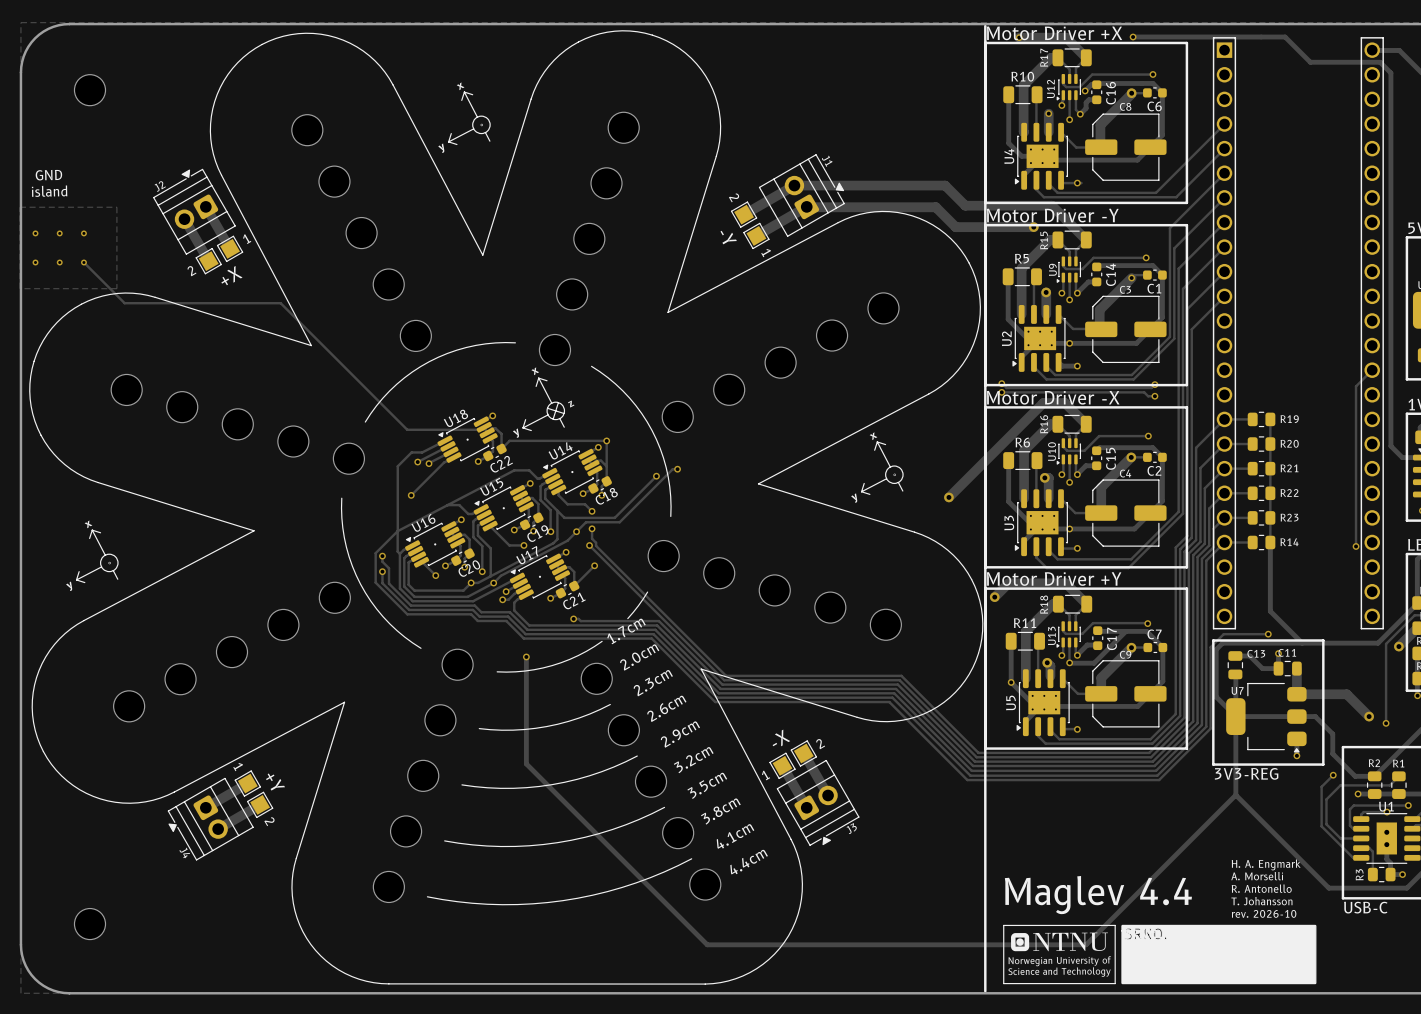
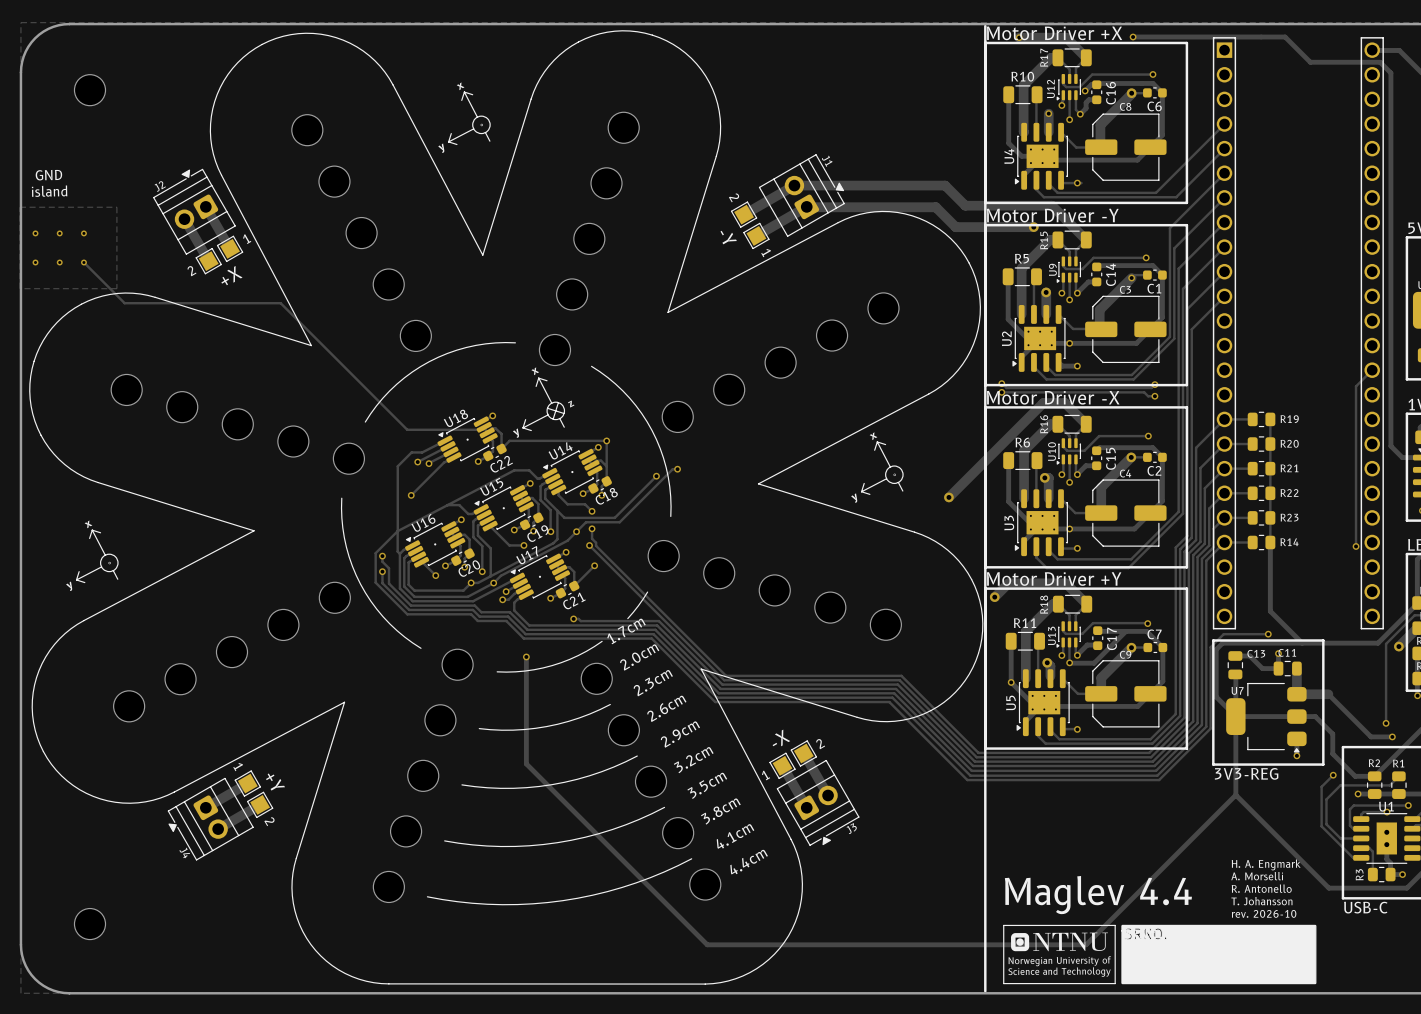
track: (1328, 694) (1346, 694) (1369, 716) -> (1328, 694) (1371, 736) (1392, 736)
via: (1369, 716) -> none
via: none -> (1392, 736)

